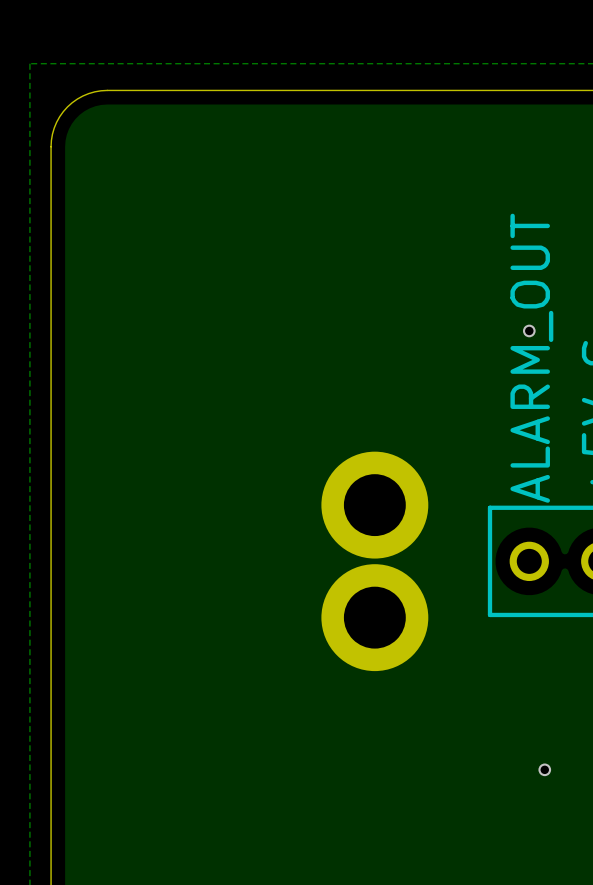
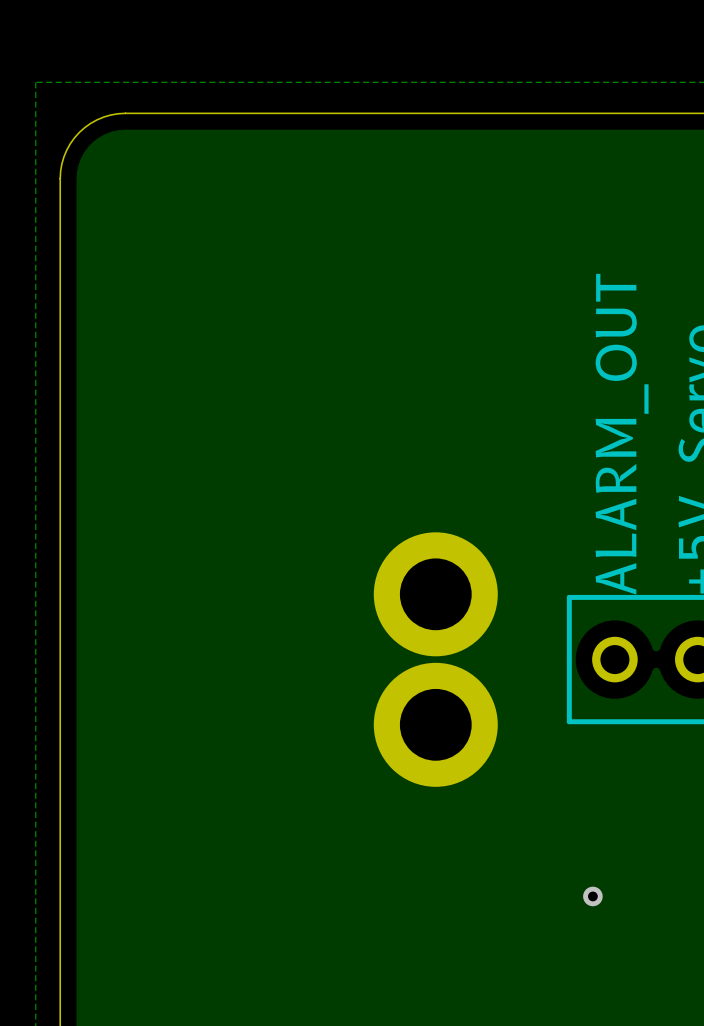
via: (529, 330) -> none
via: none -> (592, 896)
via: (544, 769) -> none

